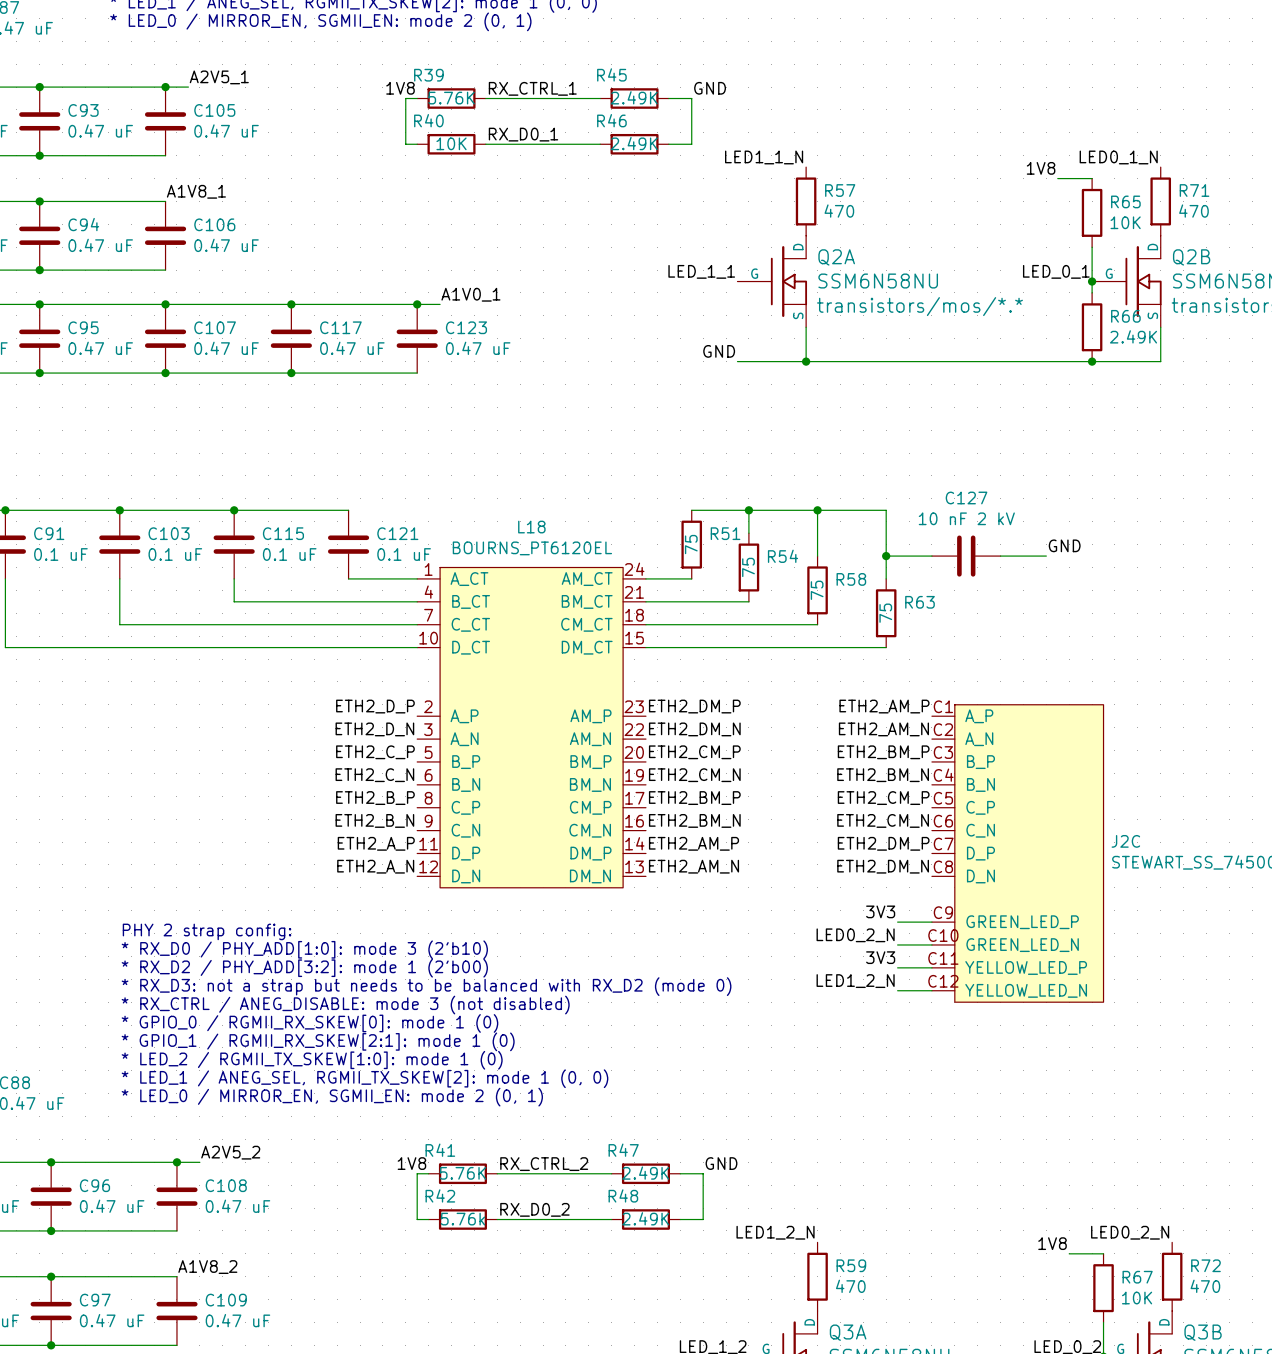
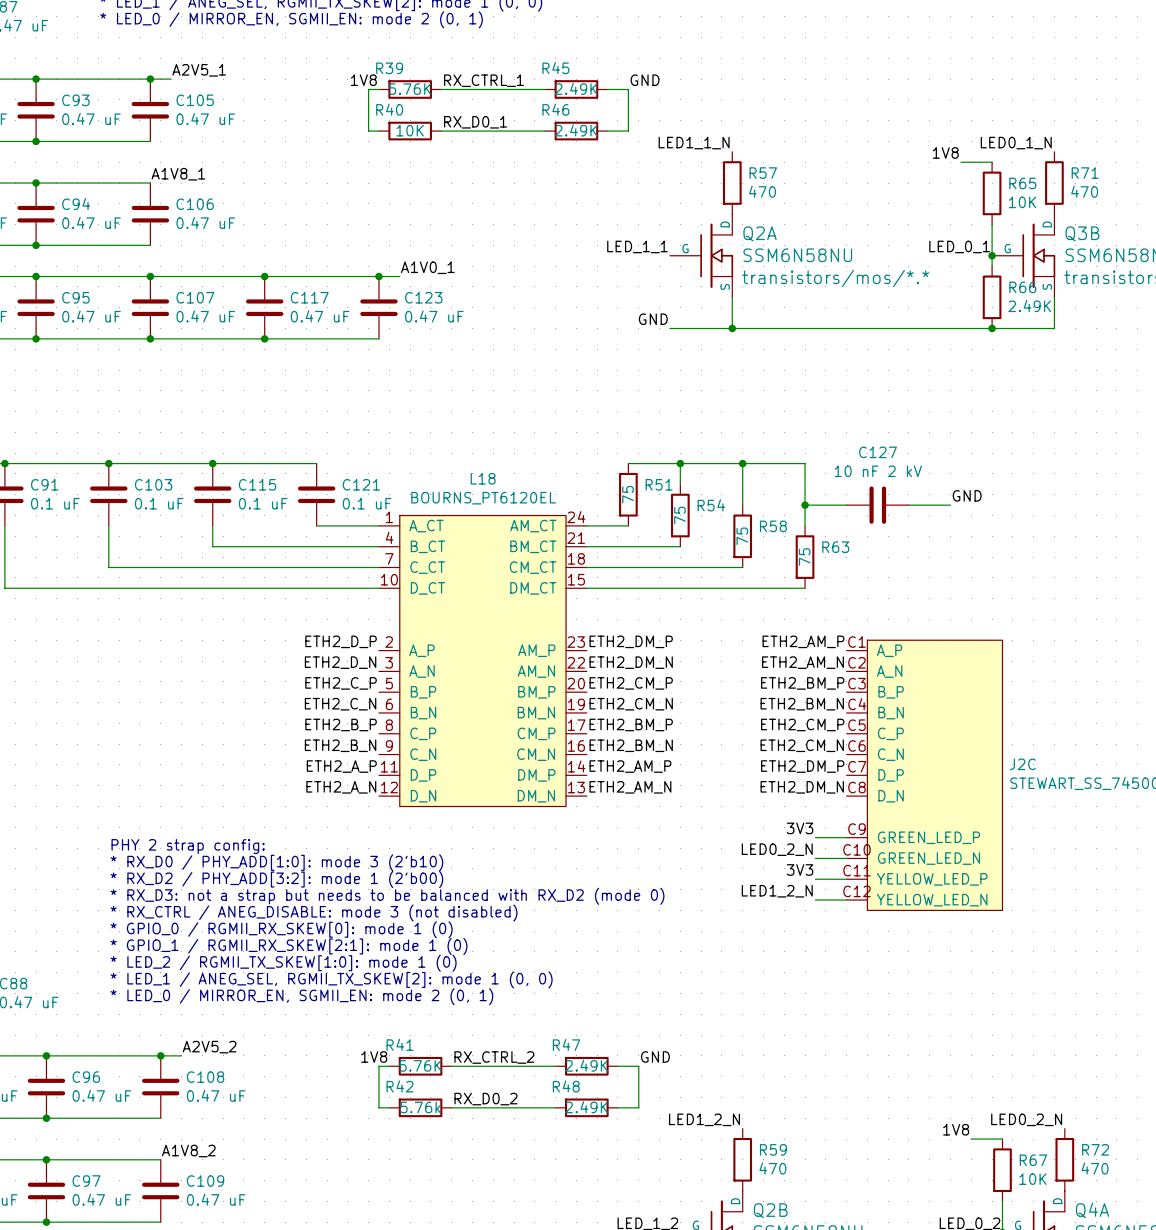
Q2B name: Q2B (1191, 257) -> Q3B (1082, 233)
Q3A name: Q3A (848, 1332) -> Q2B (770, 1210)
Q3B name: Q3B (1203, 1332) -> Q4A (1092, 1210)

